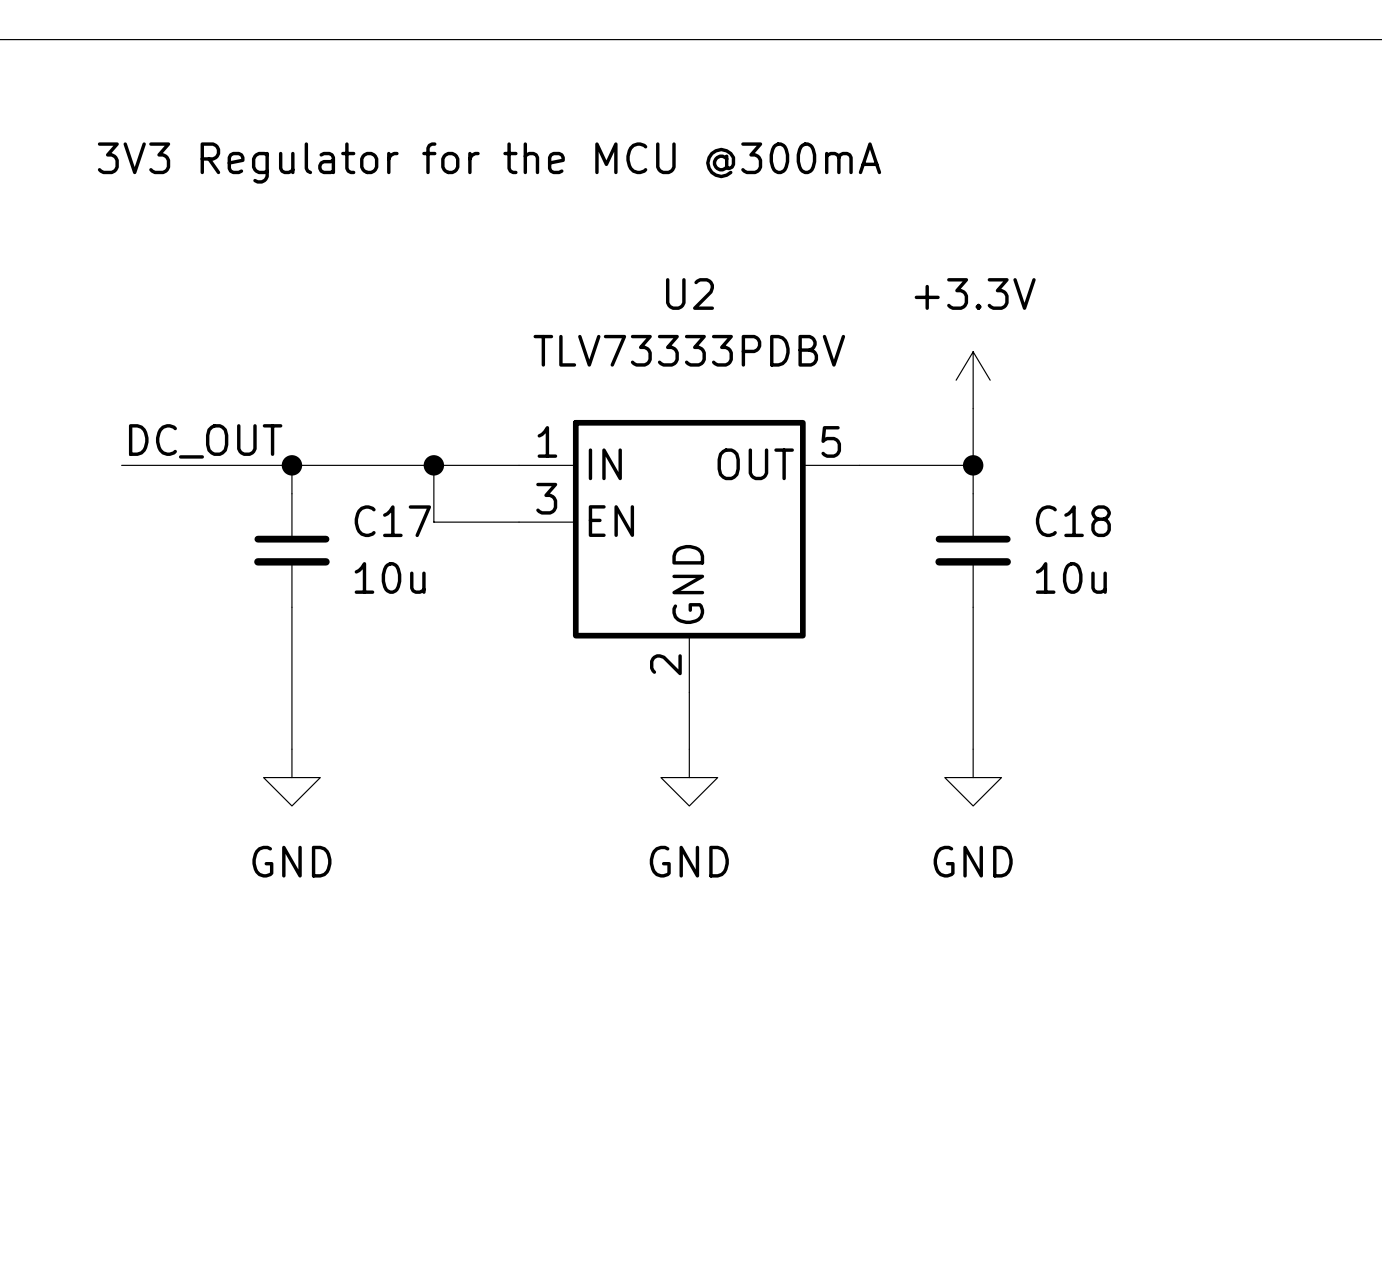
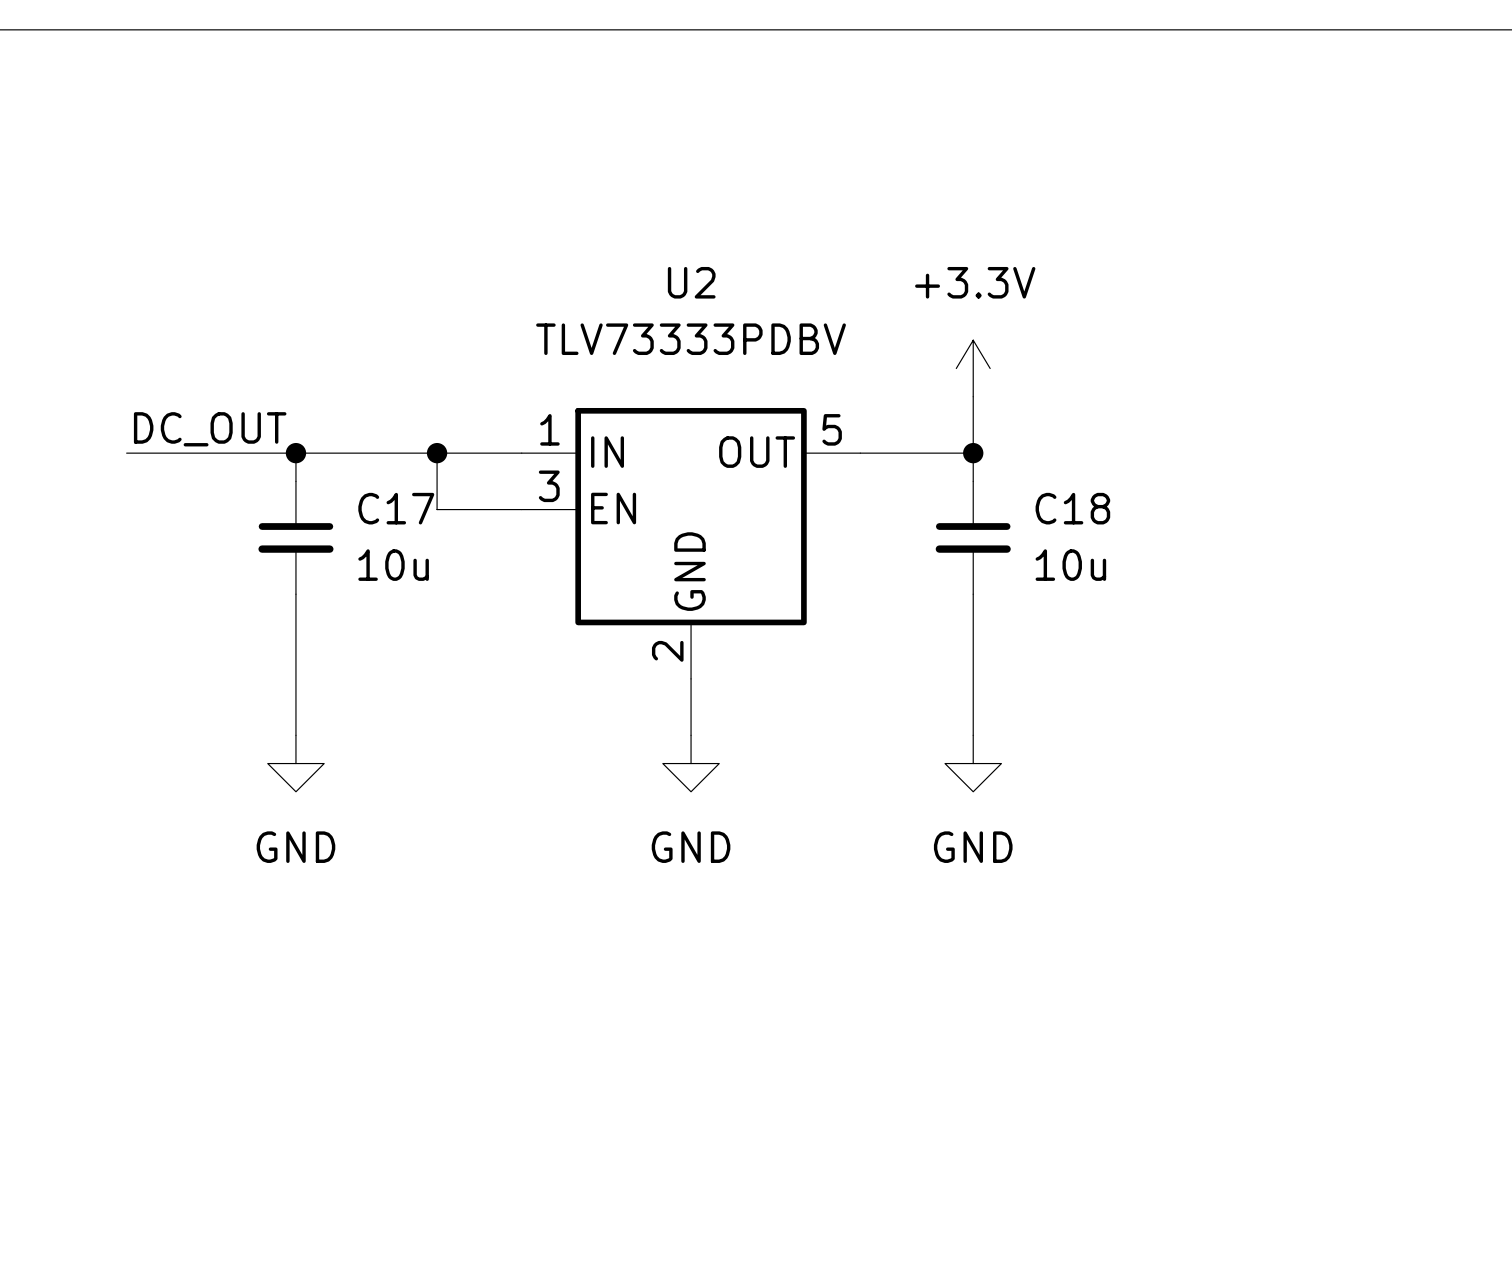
text: 3V3 Regulator for the MCU @300mA (489, 163) -> none

